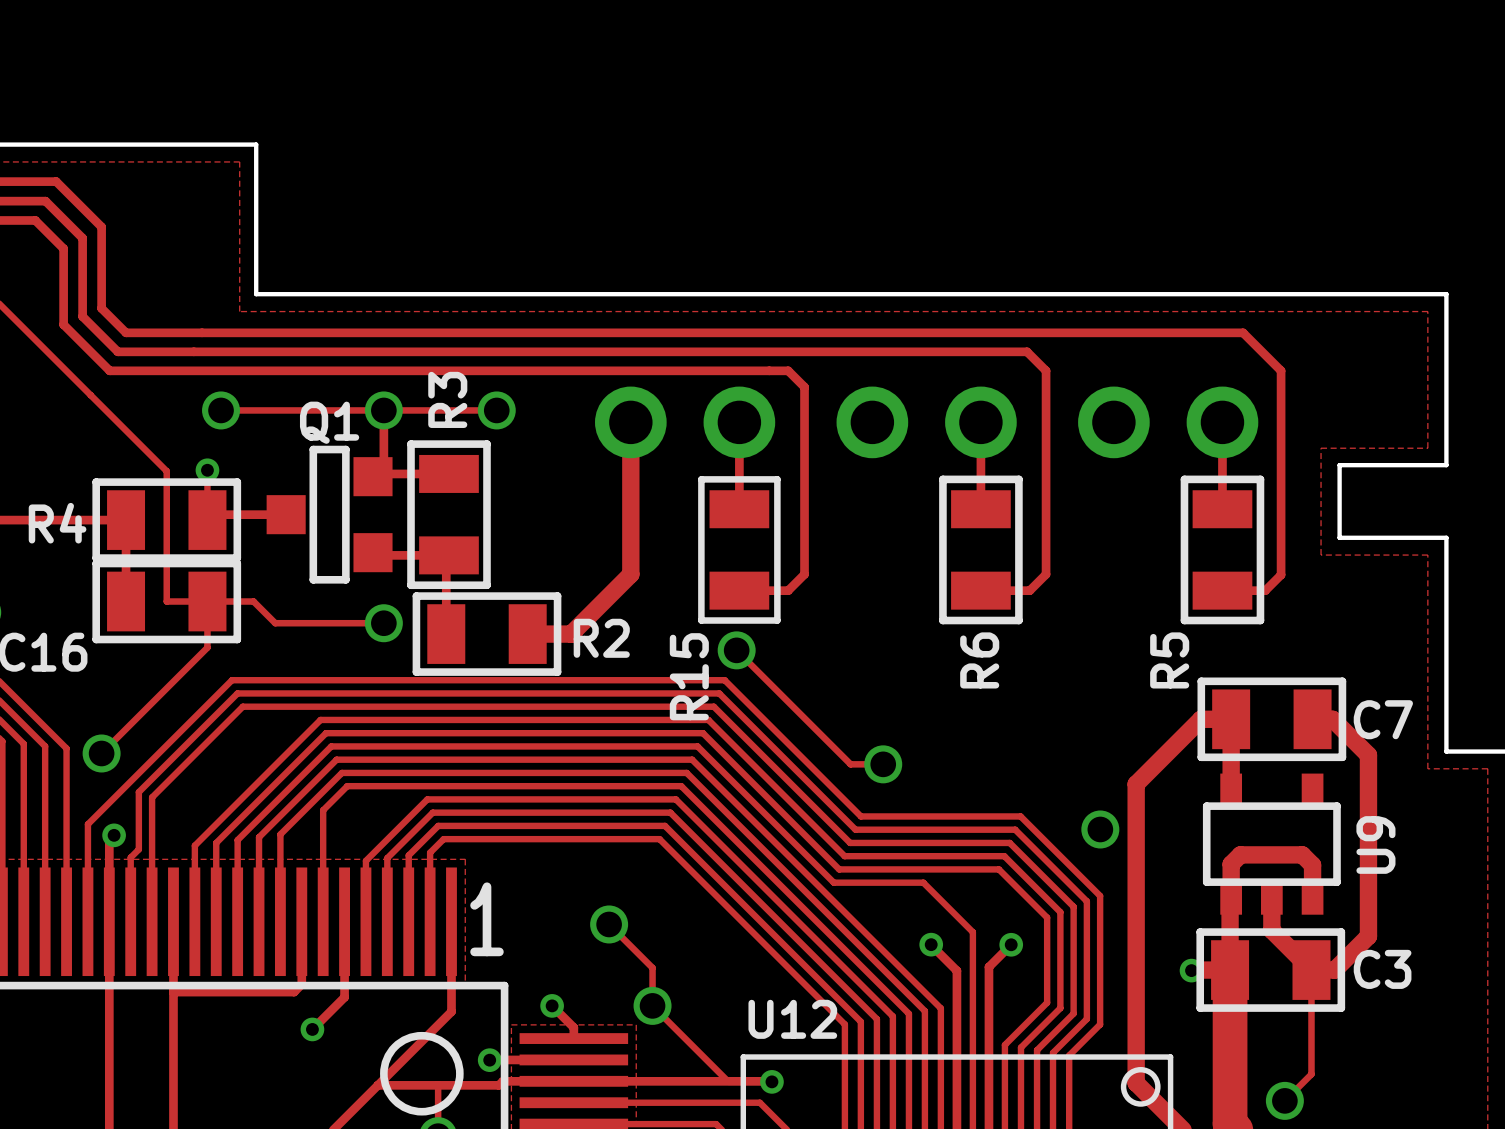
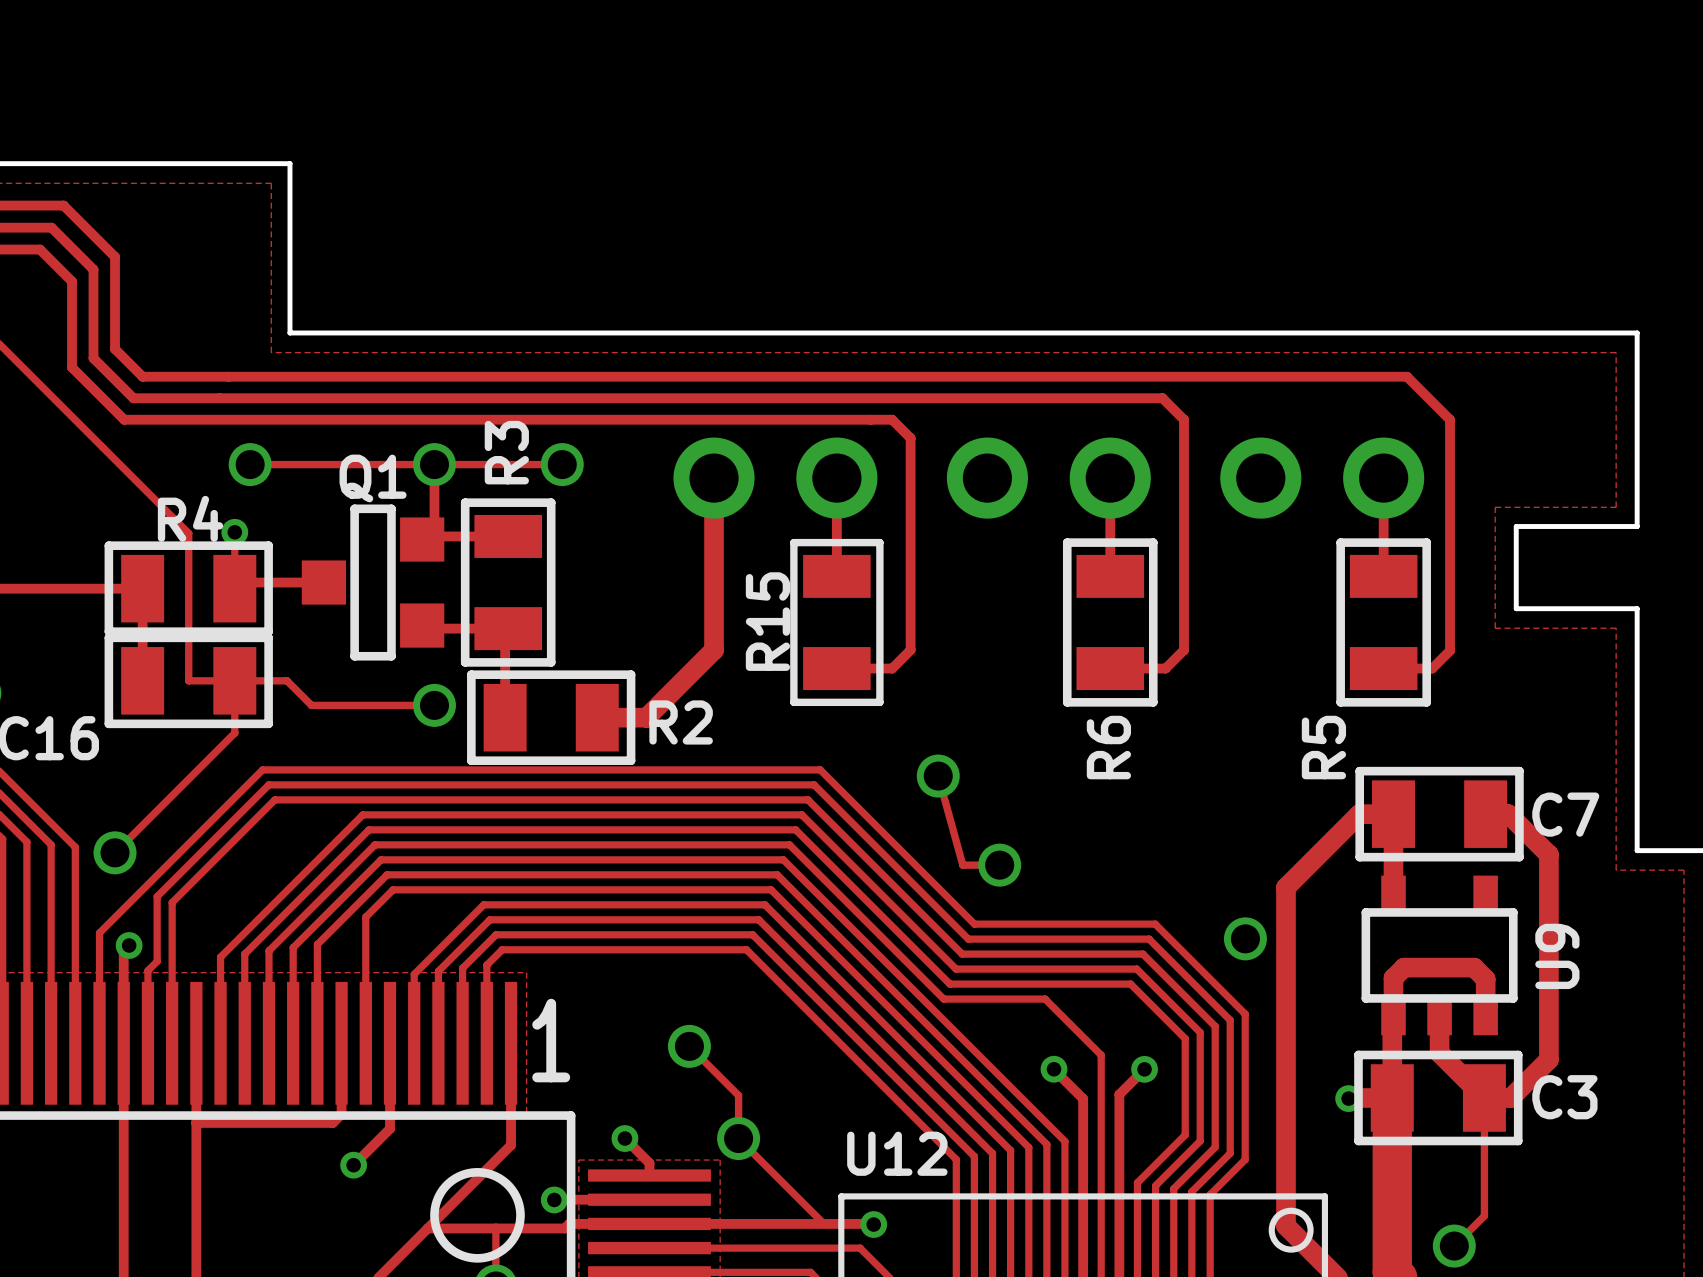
R4 name position: R4 (57, 523) -> R4 (190, 518)
track: (736, 650) (850, 764) -> (938, 776) (962, 865)
via position: (736, 650) -> (938, 776)
R15 name position: R15 (689, 676) -> R15 (767, 621)

